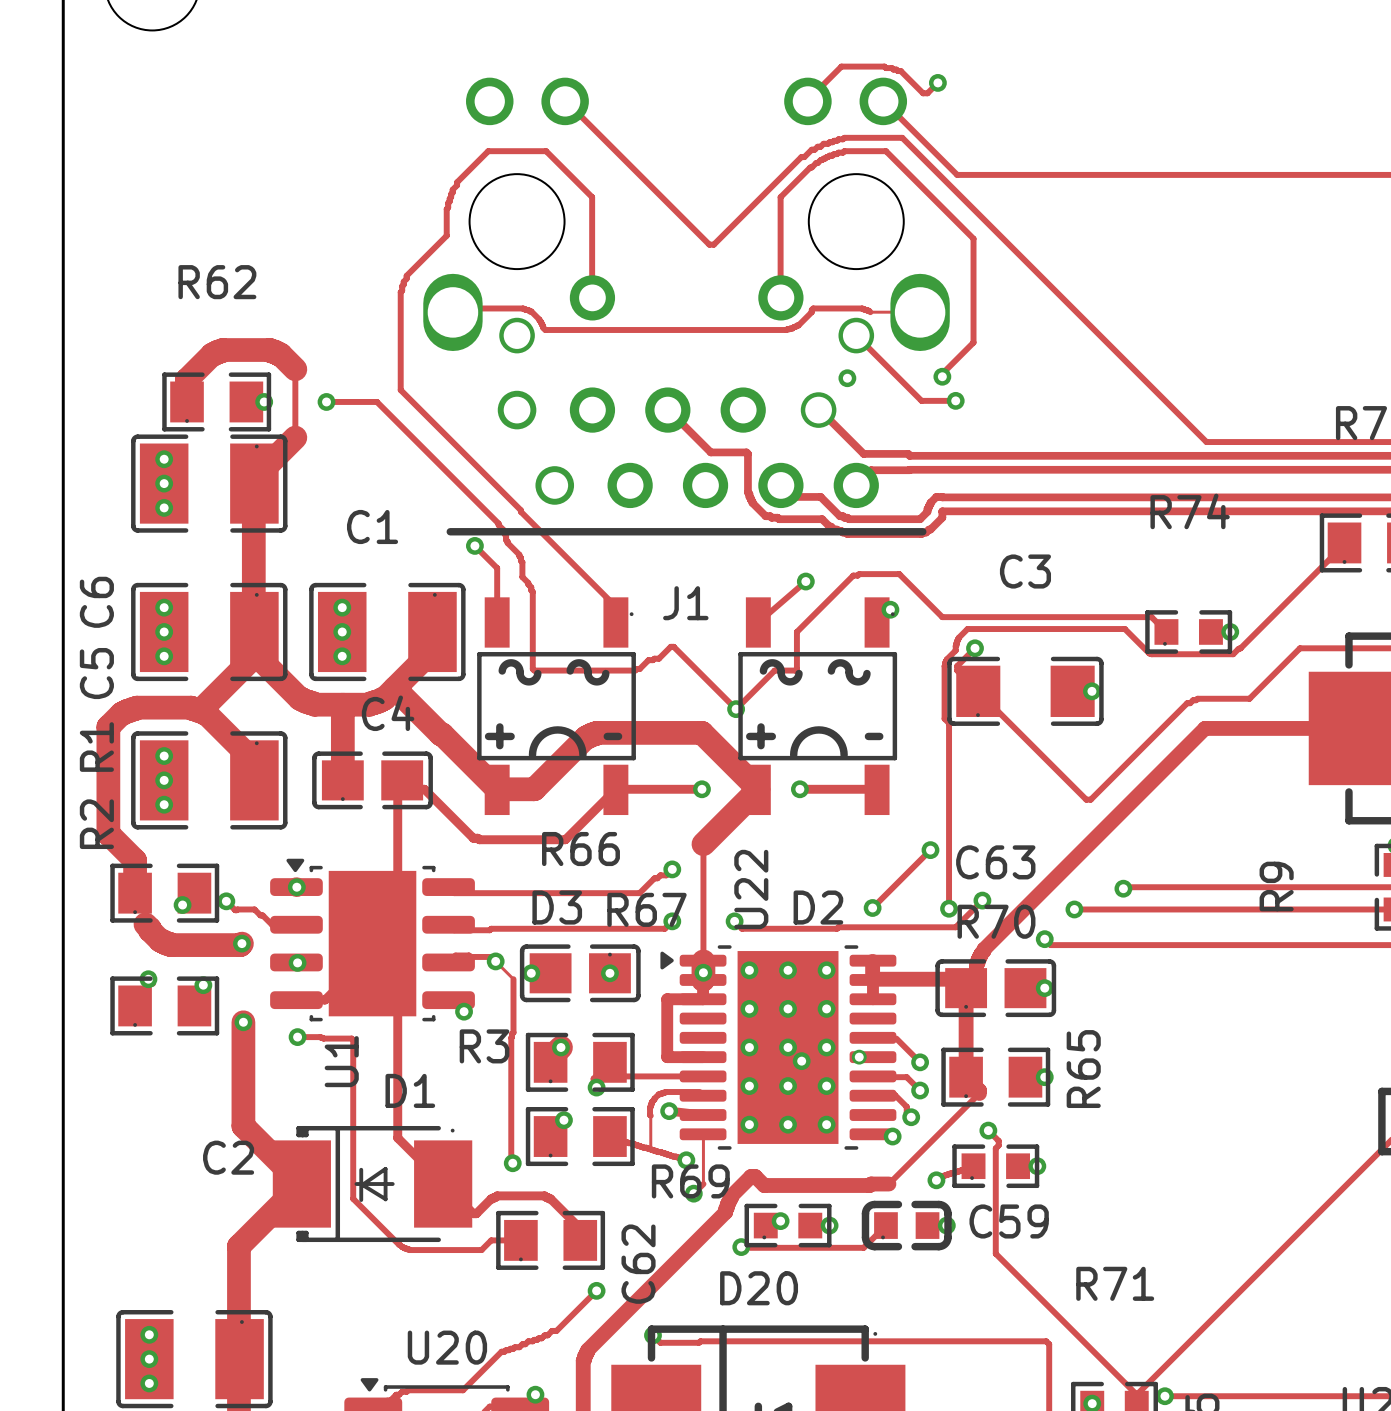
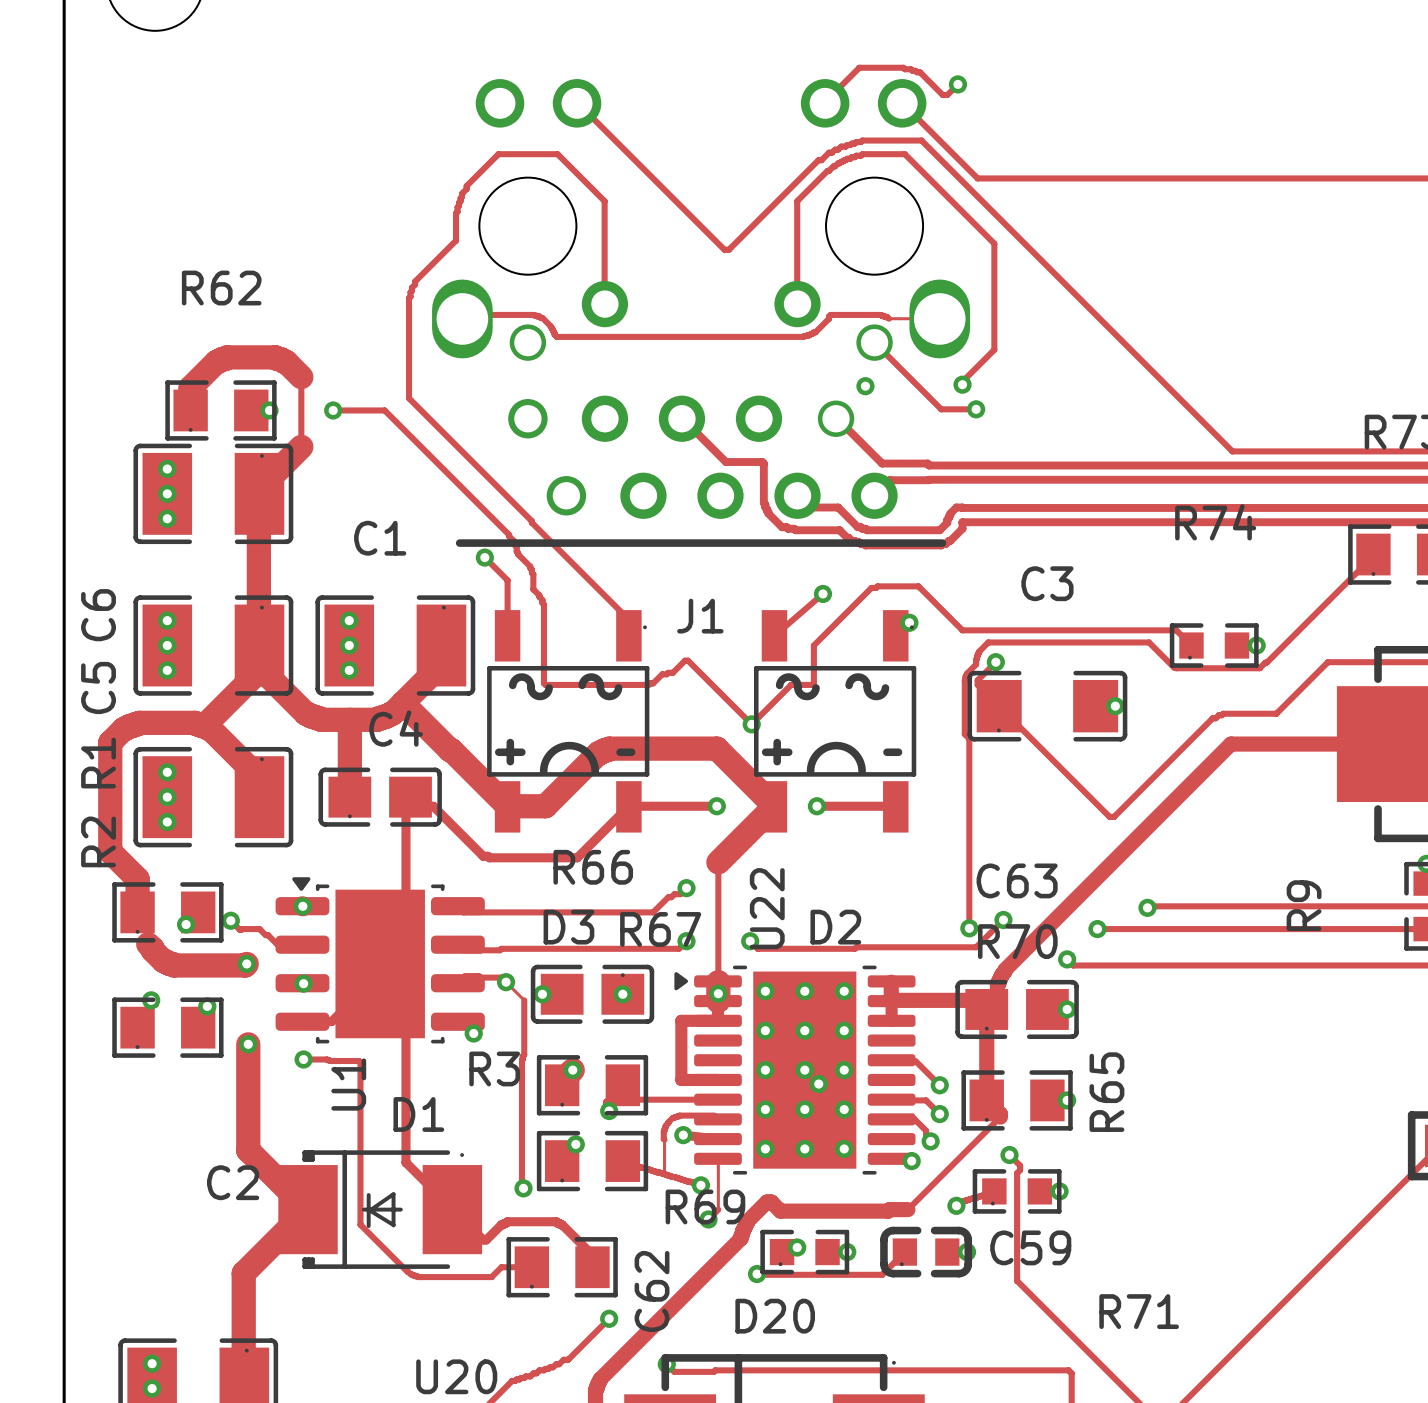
track: (930, 850) (872, 908) -> none
via: (930, 850) -> none
via: (872, 908) -> none
via: (859, 1057) -> none

